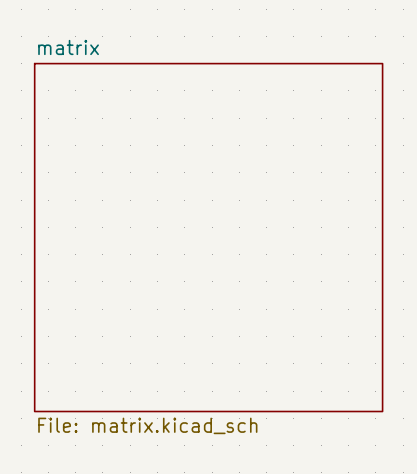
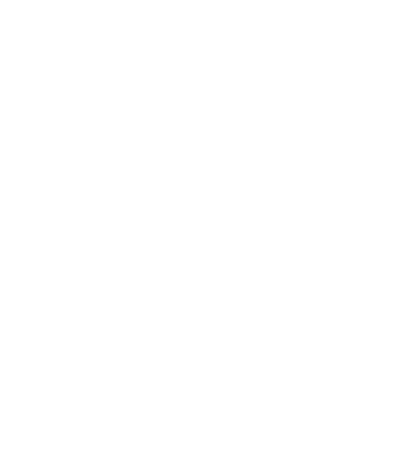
sheet matrix: File: matrix.kicad_sch (208, 237) -> none

